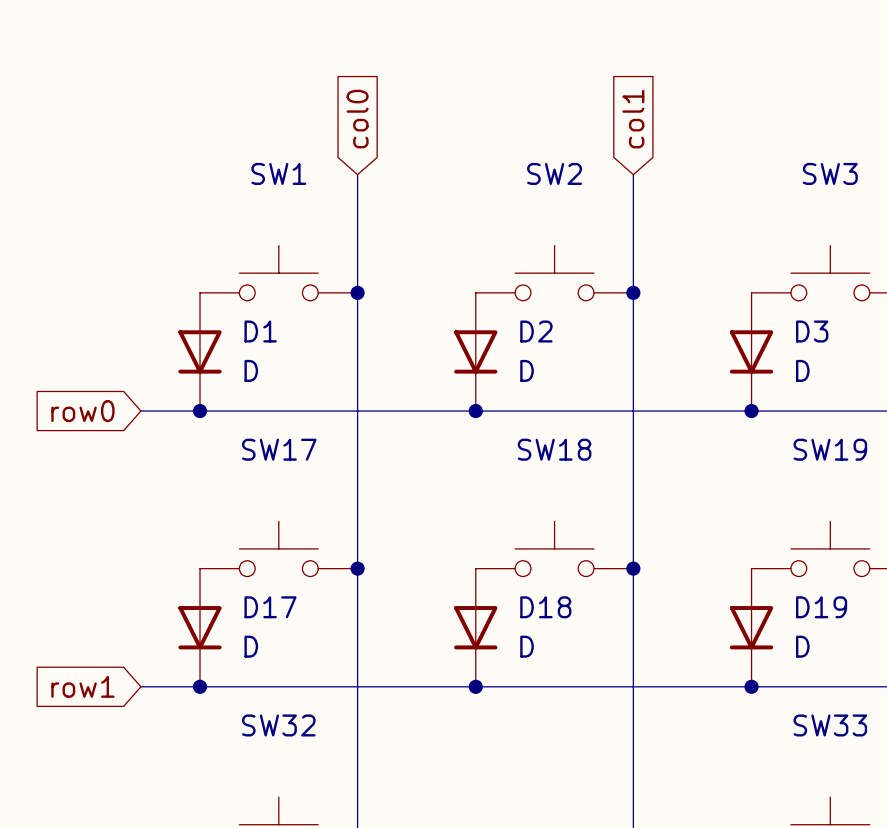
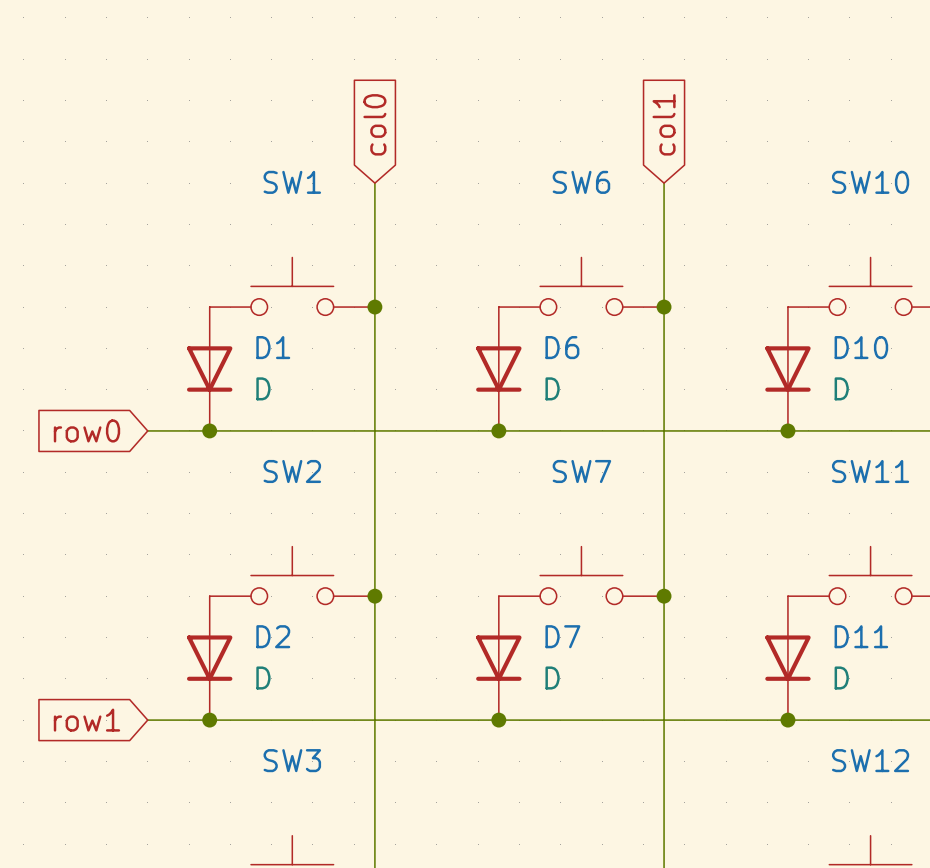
SW2 name: SW2 (554, 173) -> SW6 (581, 182)
SW3 name: SW3 (830, 173) -> SW10 (870, 182)
D2 name: D2 (536, 331) -> D6 (562, 347)
D3 name: D3 (812, 331) -> D10 (861, 347)
SW17 name: SW17 (279, 449) -> SW2 (292, 471)
SW18 name: SW18 (554, 449) -> SW7 (581, 471)
SW19 name: SW19 (830, 449) -> SW11 (870, 471)
D17 name: D17 (270, 607) -> D2 (273, 636)
D18 name: D18 (545, 607) -> D7 (562, 636)
D19 name: D19 (821, 607) -> D11 (861, 636)
SW32 name: SW32 (278, 725) -> SW3 (292, 760)
SW33 name: SW33 (830, 725) -> SW12 (870, 760)

